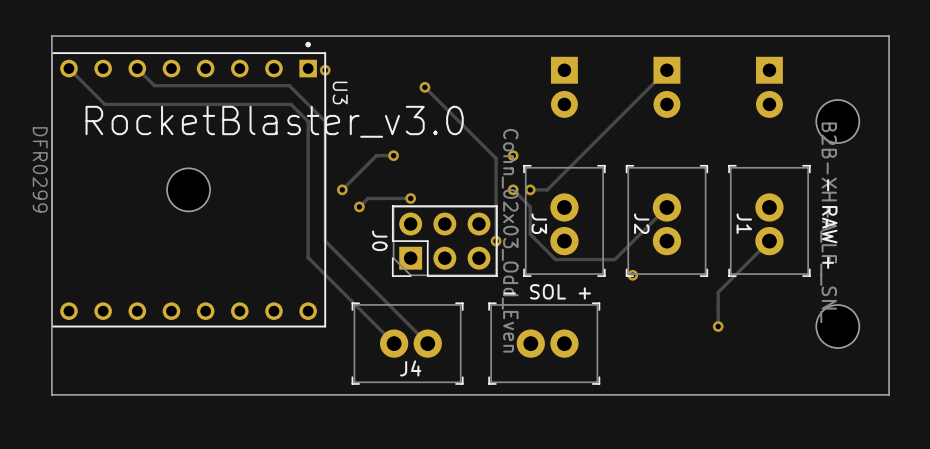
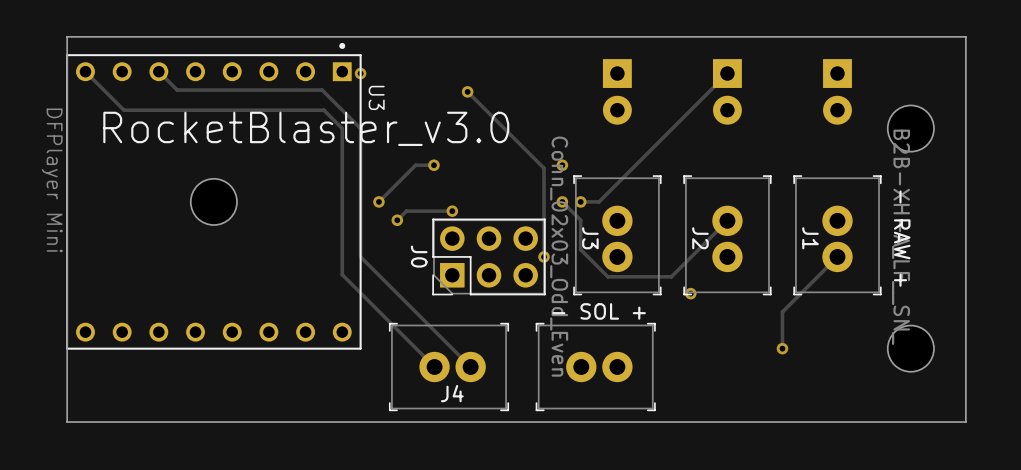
U3 value: DFR0299 (40, 169) -> DFPlayer Mini (52, 180)

